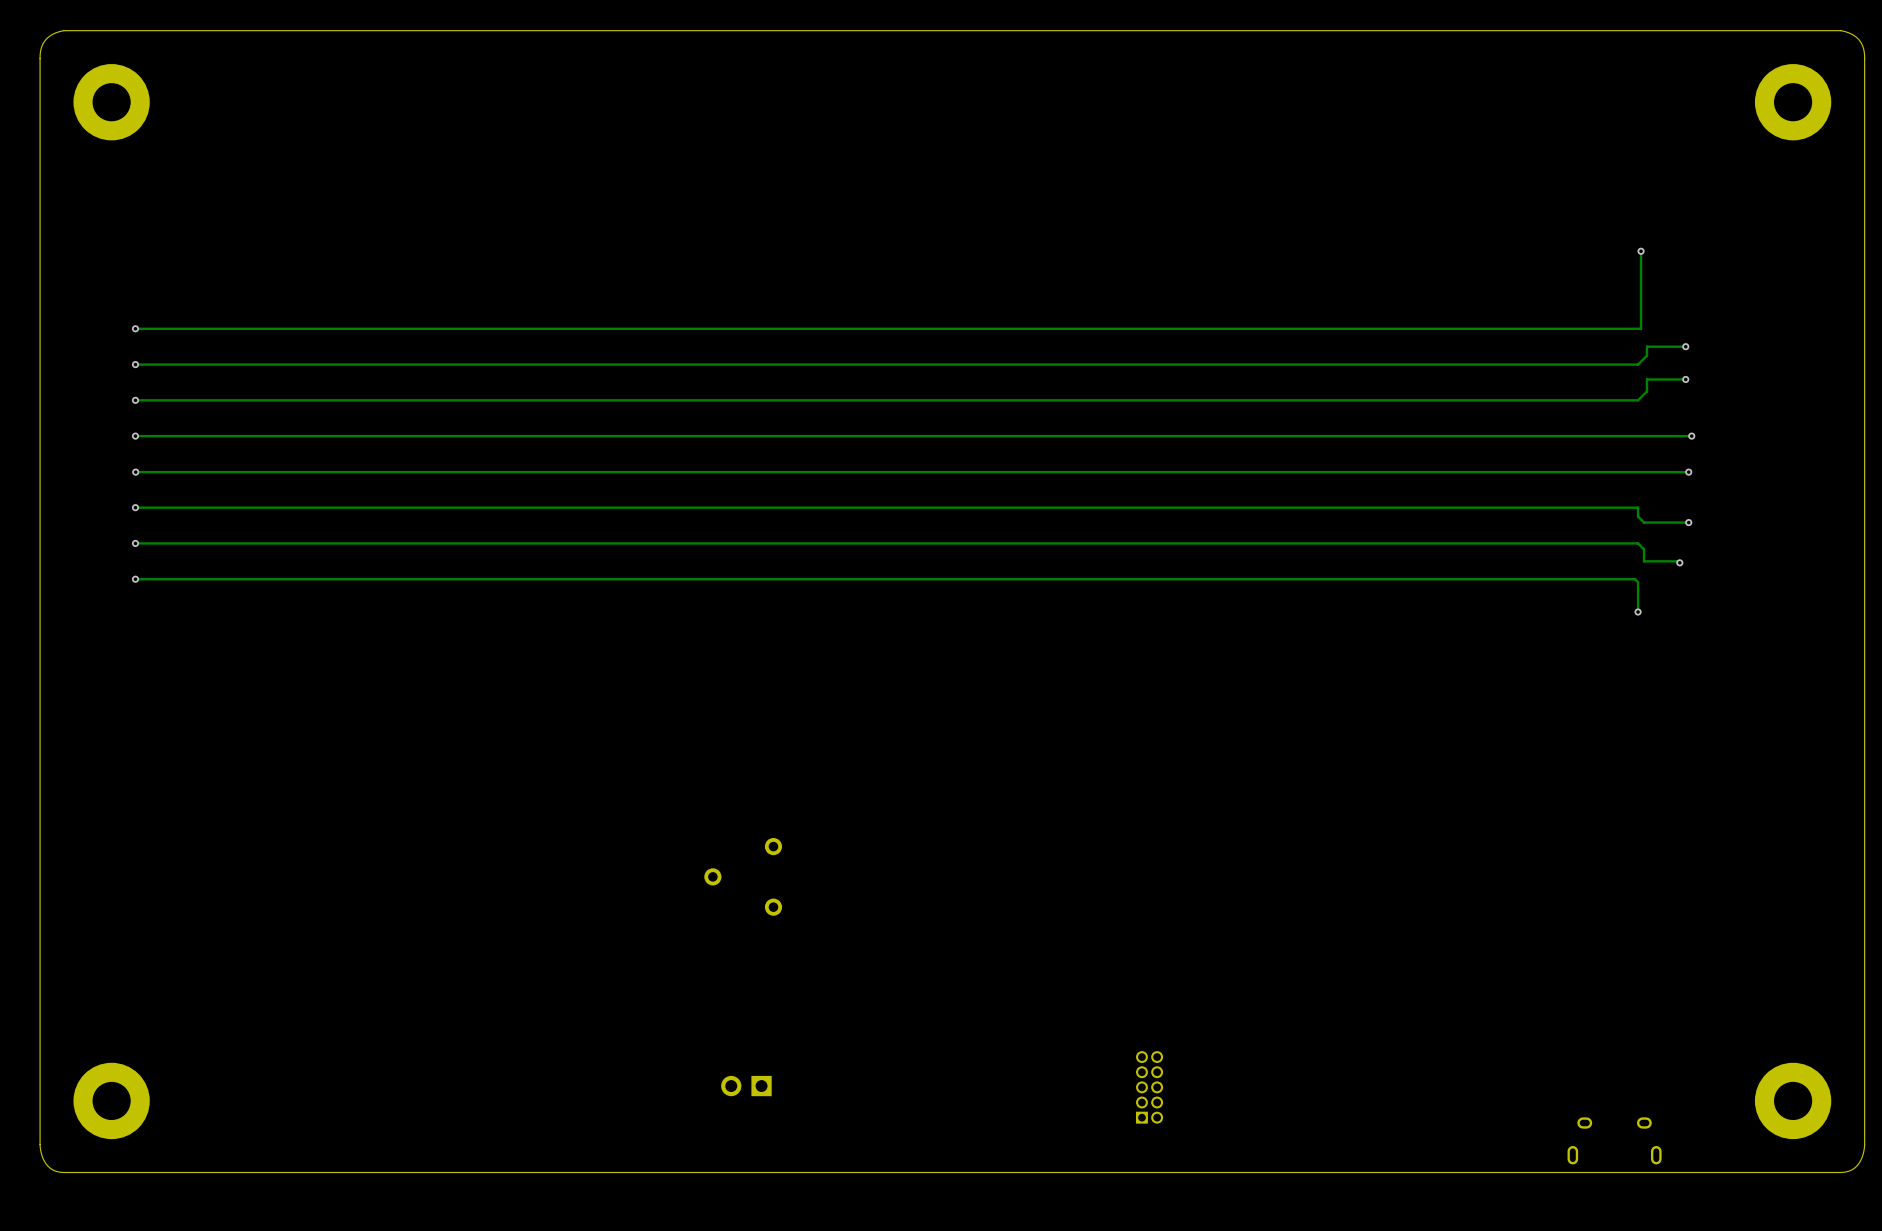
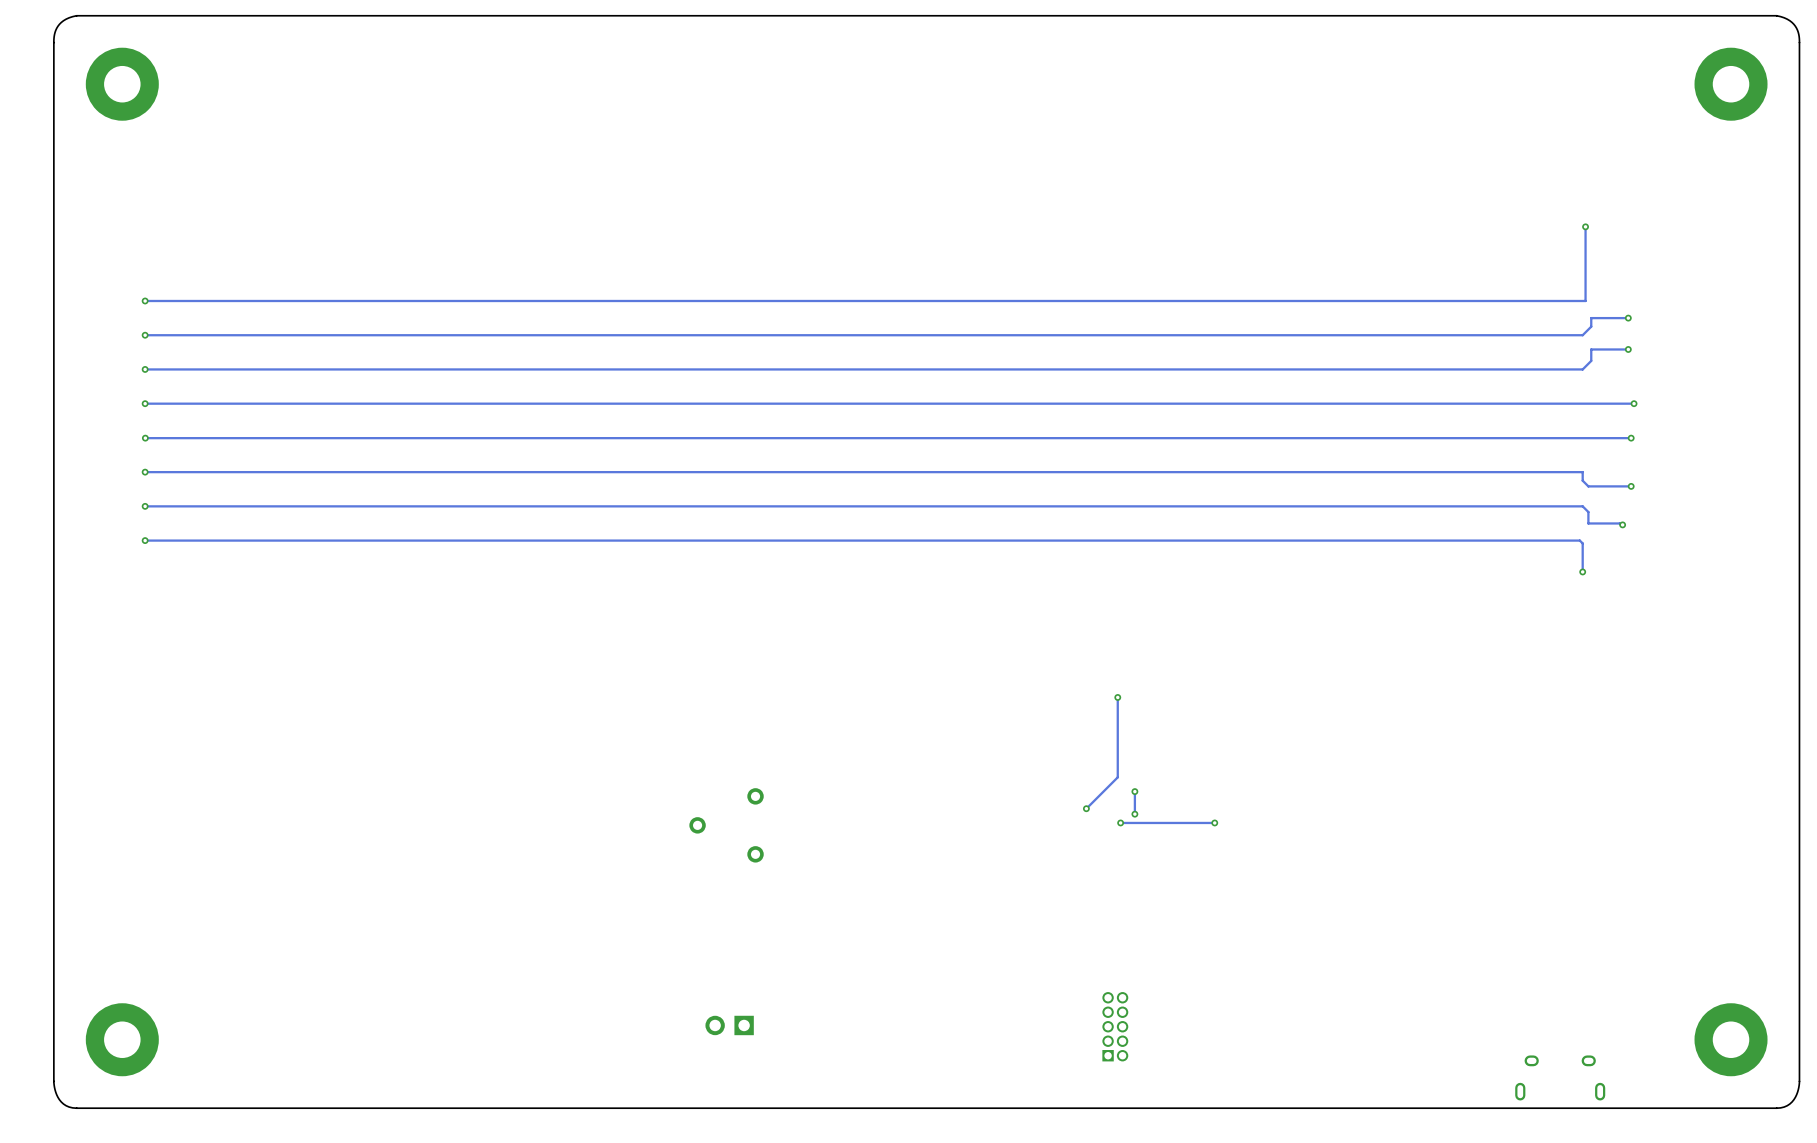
track: none -> (1117, 697) (1117, 777) (1086, 808)
via: none -> (1117, 697)
track: none -> (1134, 791) (1134, 814)
via: none -> (1134, 791)
via: none -> (1086, 808)
via: none -> (1134, 814)
via: none -> (1120, 822)
track: none -> (1214, 822) (1120, 822)
via: none -> (1214, 822)

